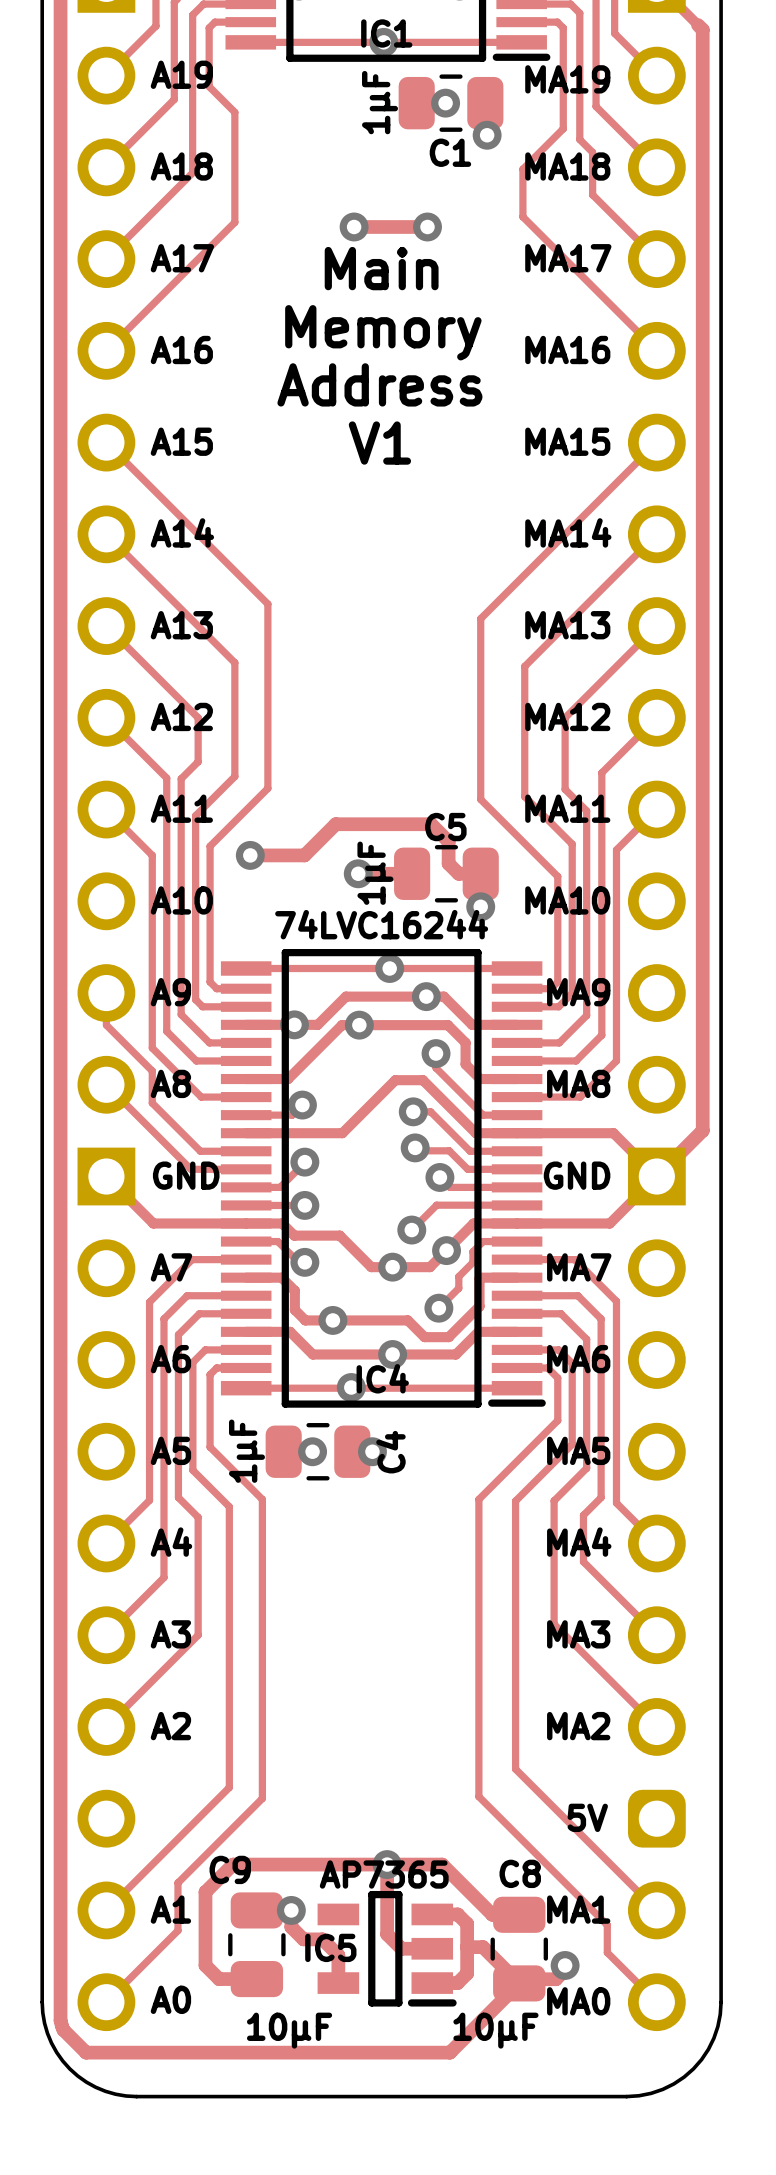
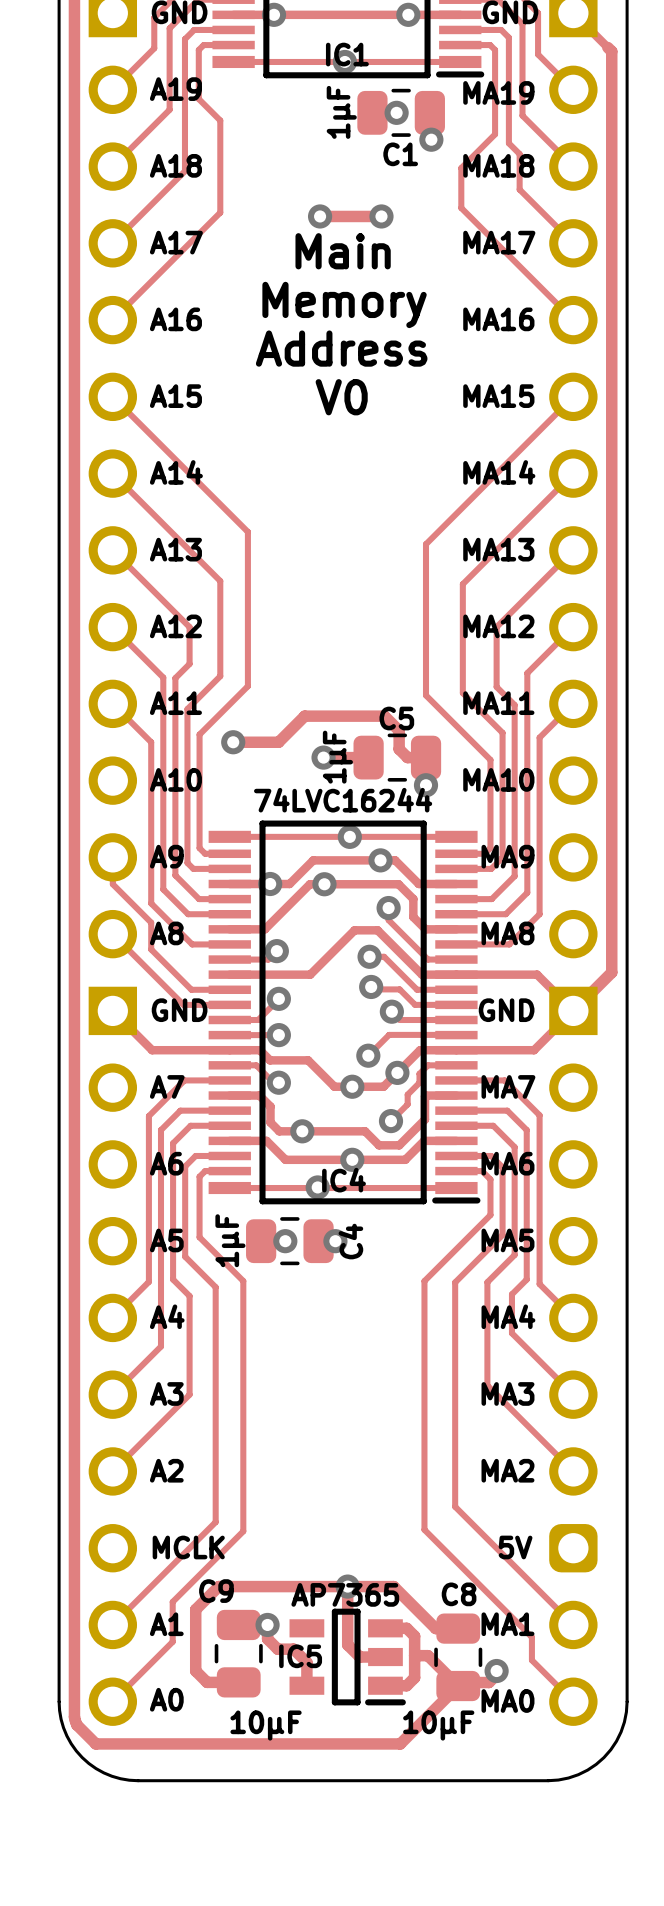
text: V1 (379, 443) -> V0 (341, 397)
text: none -> MCLK (188, 1547)

